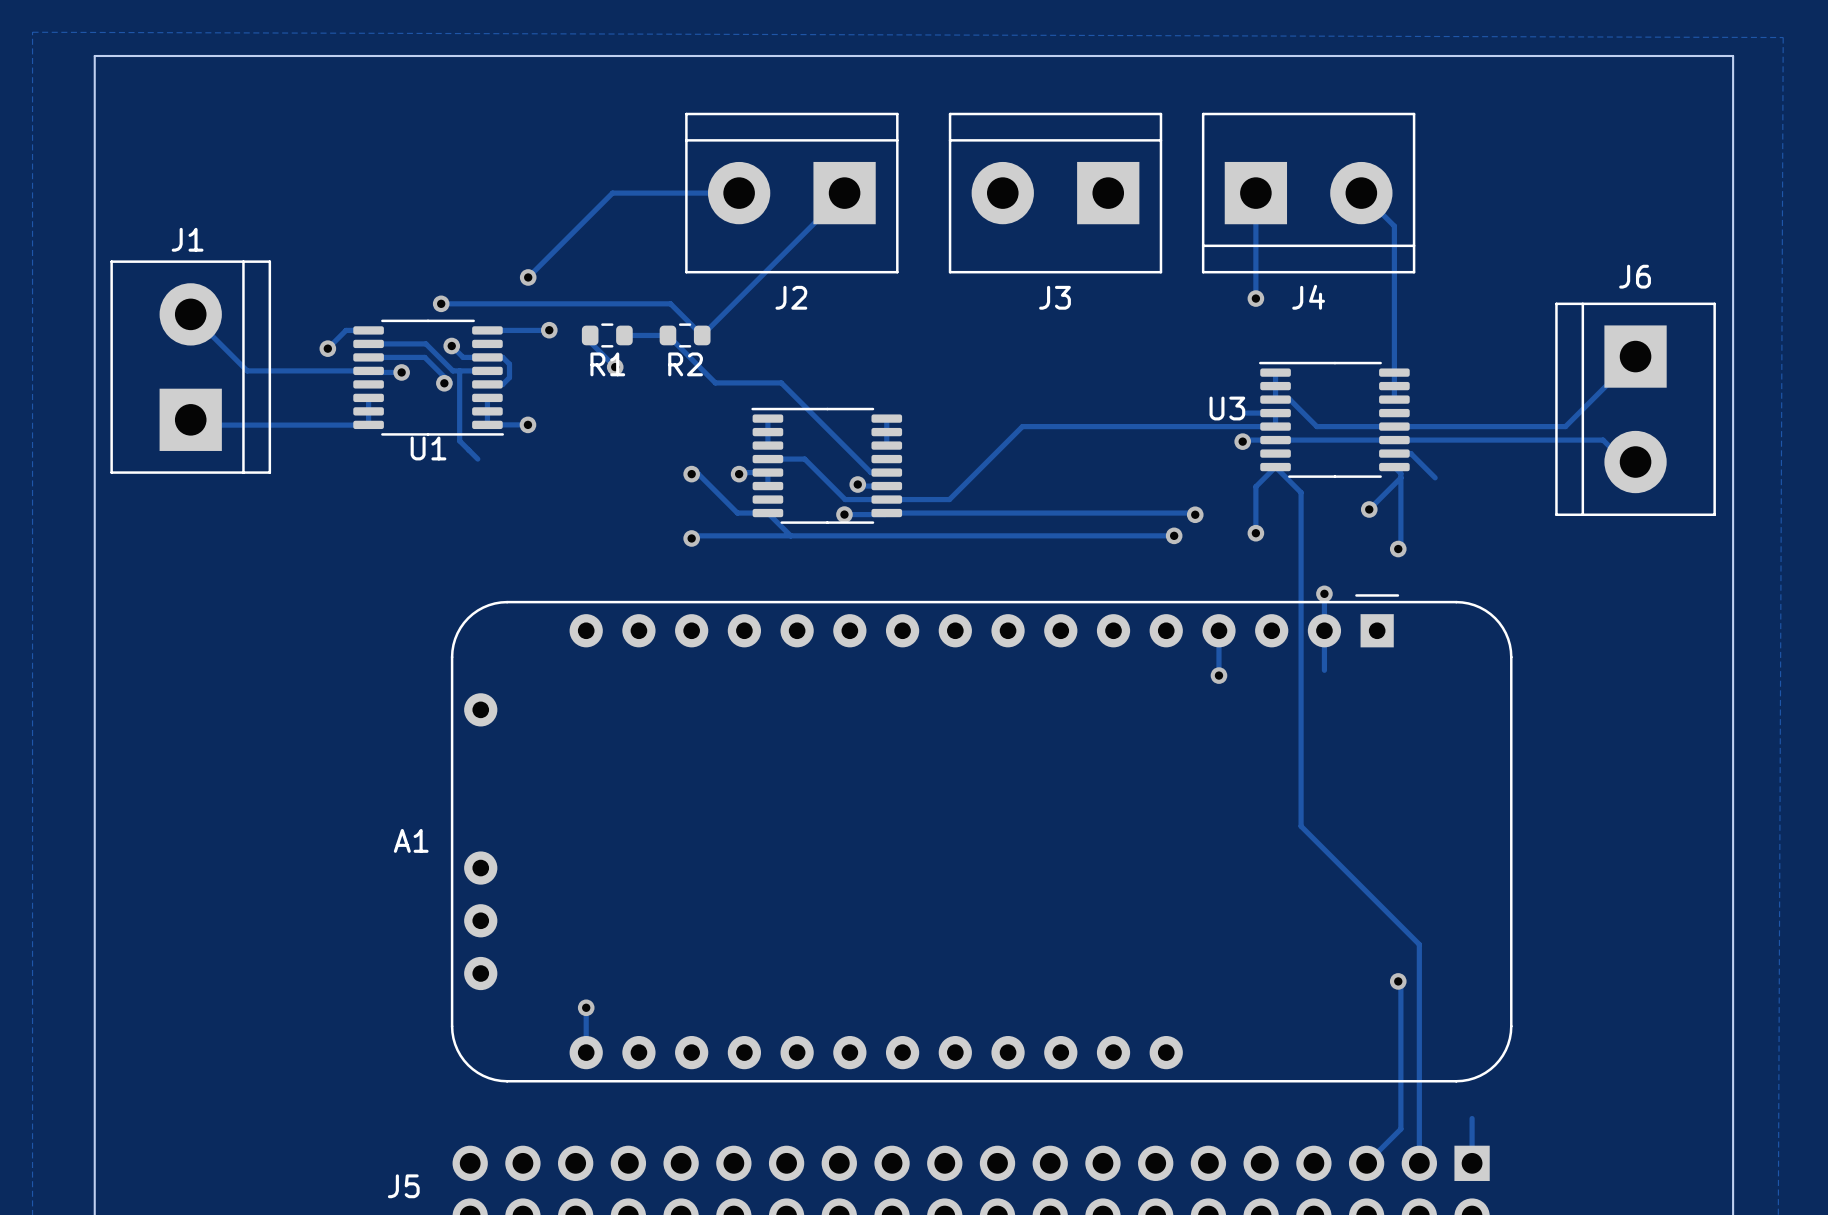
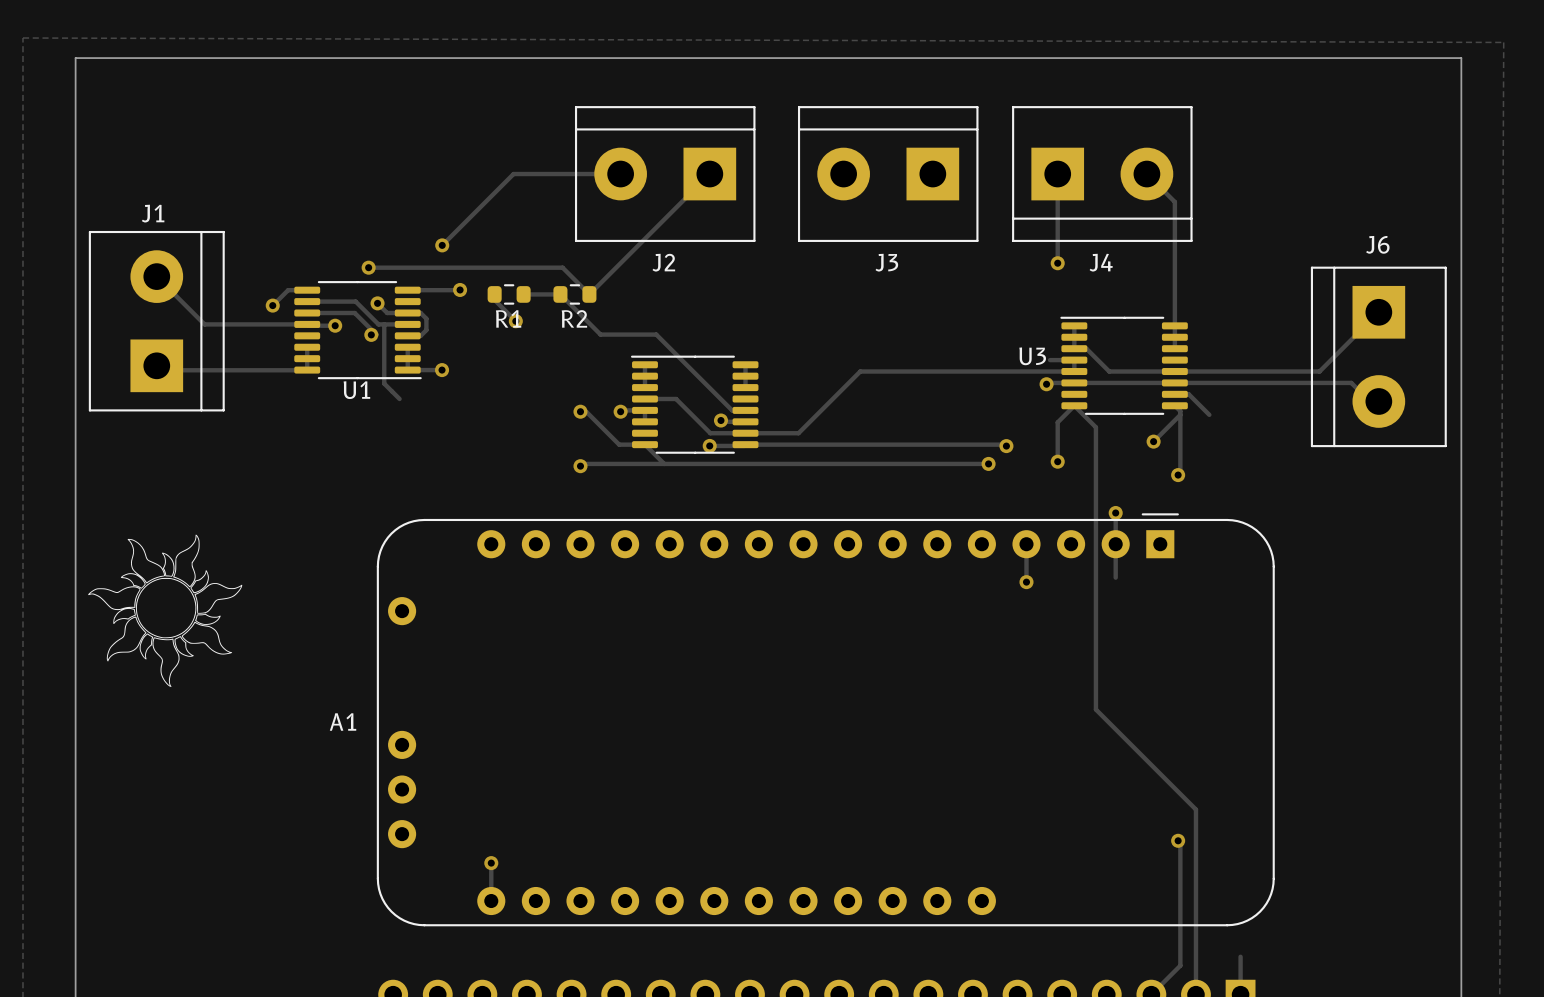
drawing: none -> [88, 534, 243, 687]

